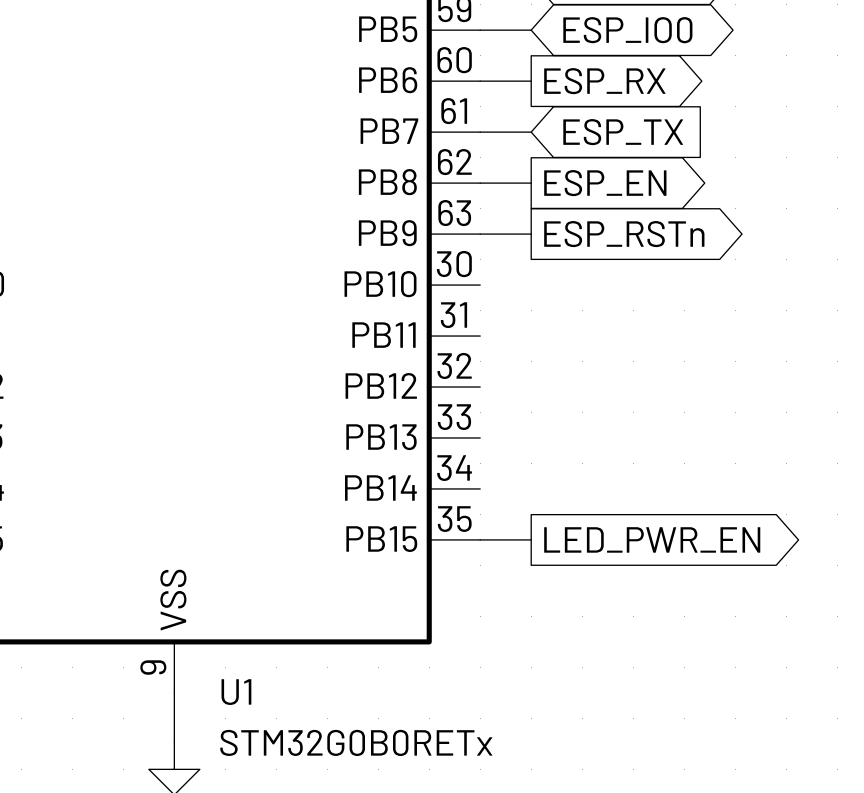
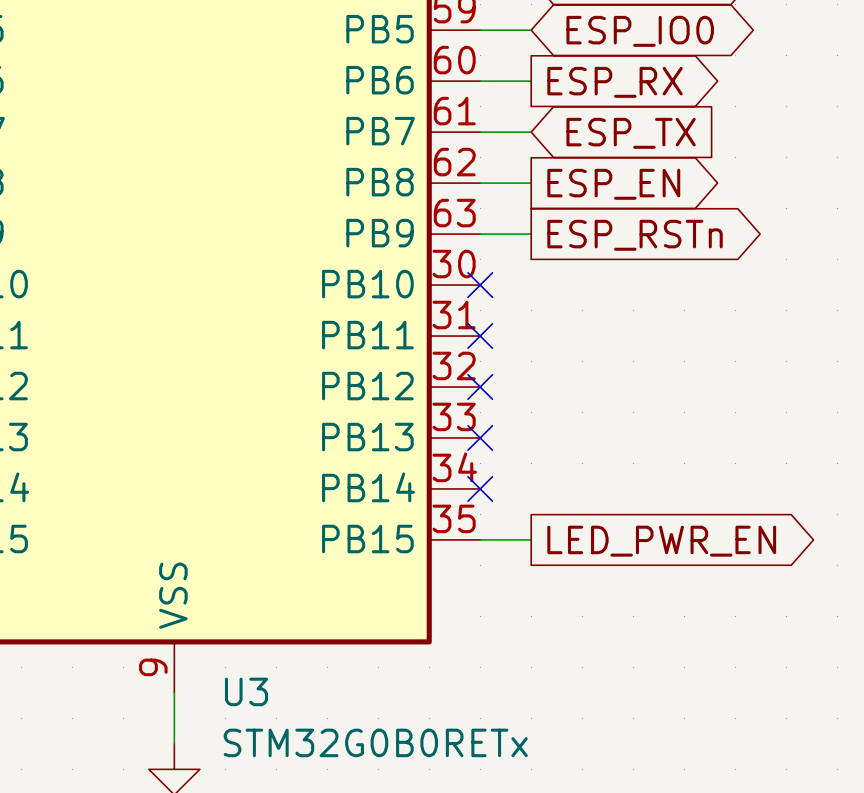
no-connect mark: none -> (480, 285)
no-connect mark: none -> (480, 336)
no-connect mark: none -> (480, 387)
no-connect mark: none -> (480, 437)
no-connect mark: none -> (480, 488)
U1 name: U1 (236, 692) -> U3 (246, 691)

